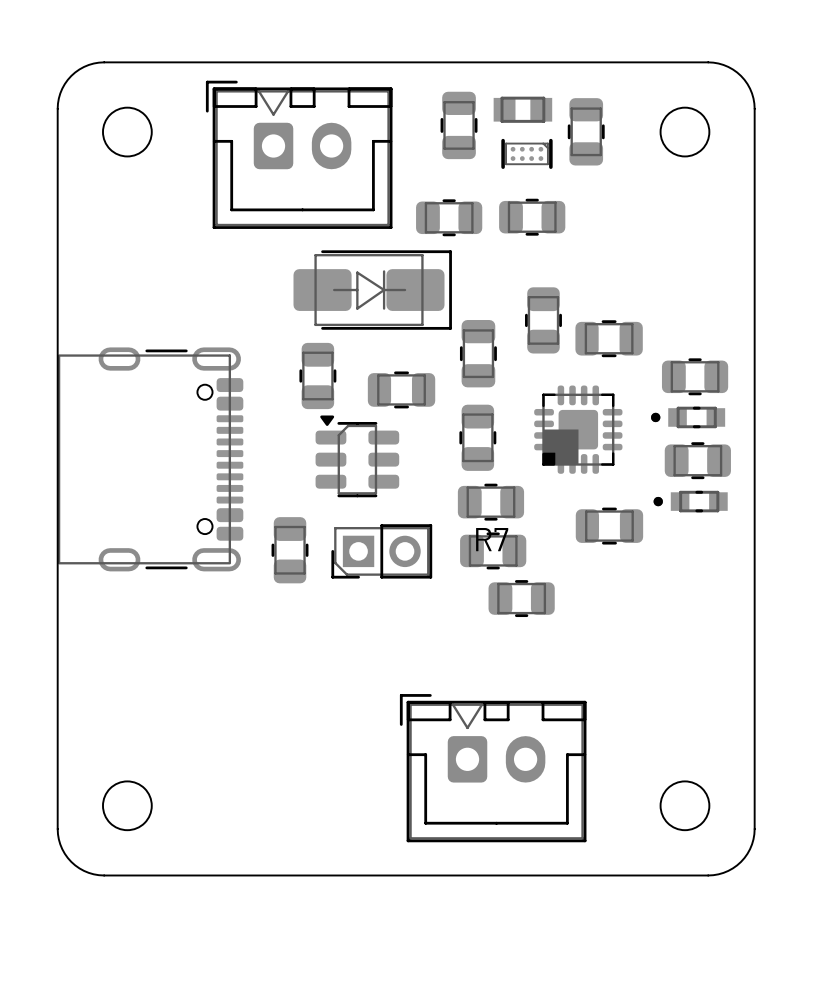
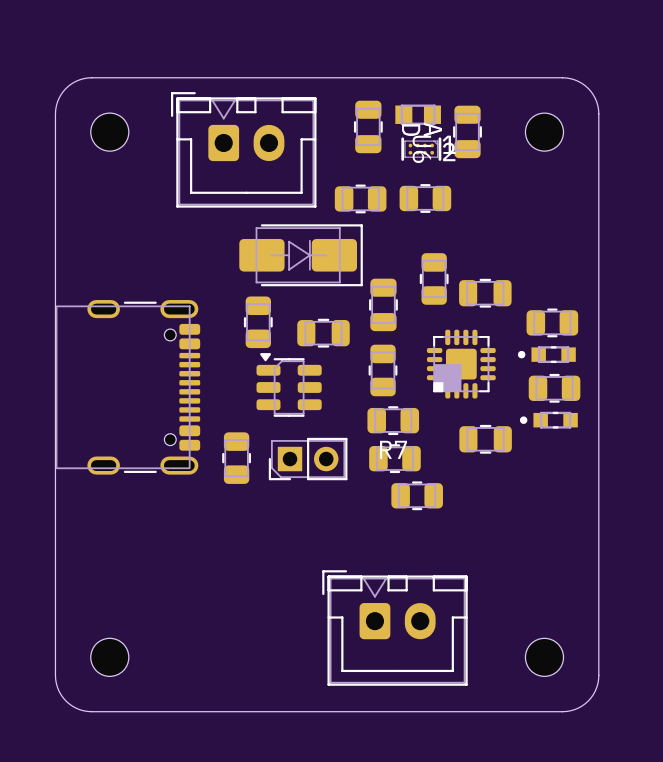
U6 footprint: [501, 138, 553, 169] -> [401, 137, 442, 161]
U6 name: none -> U6 (421, 149)

